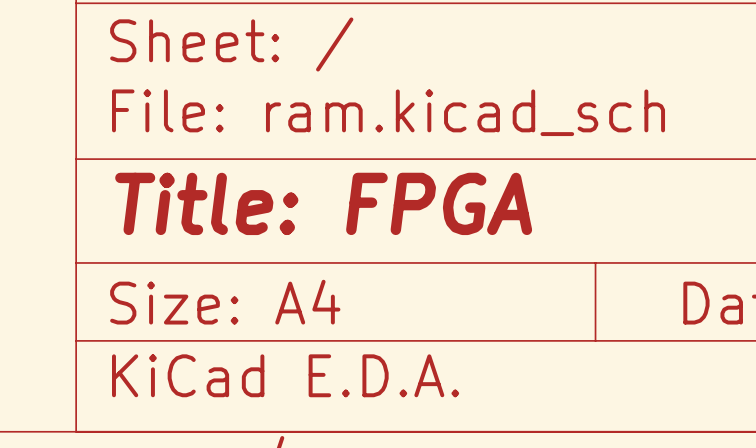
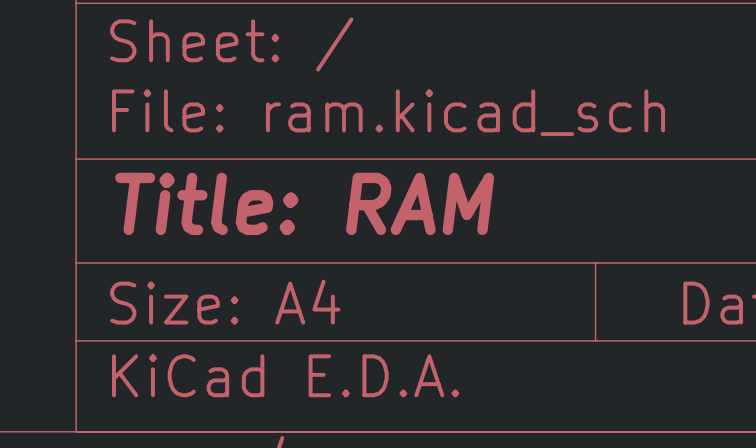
title block: Title: FPGA (323, 203) -> Title: RAM (304, 203)

